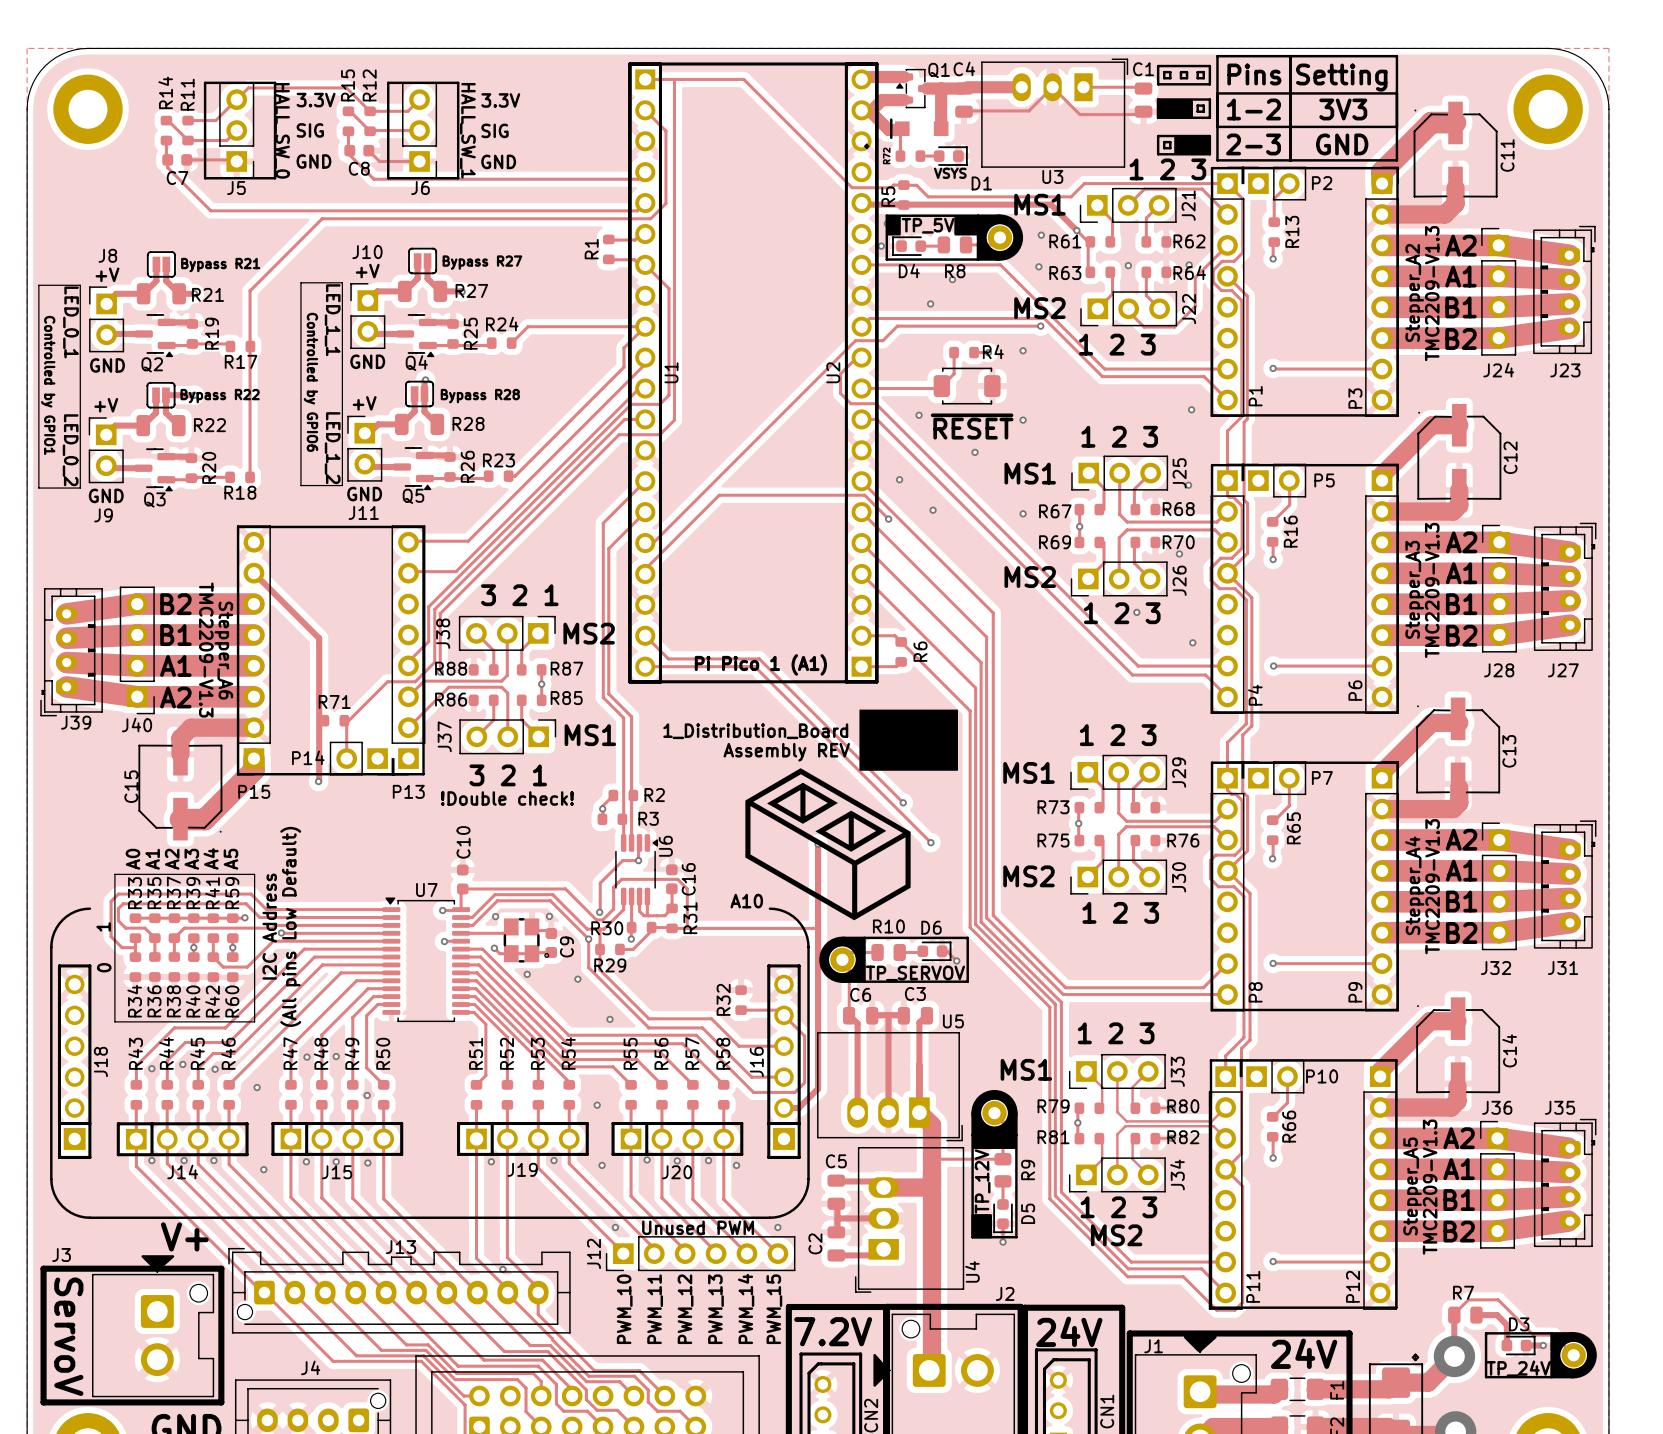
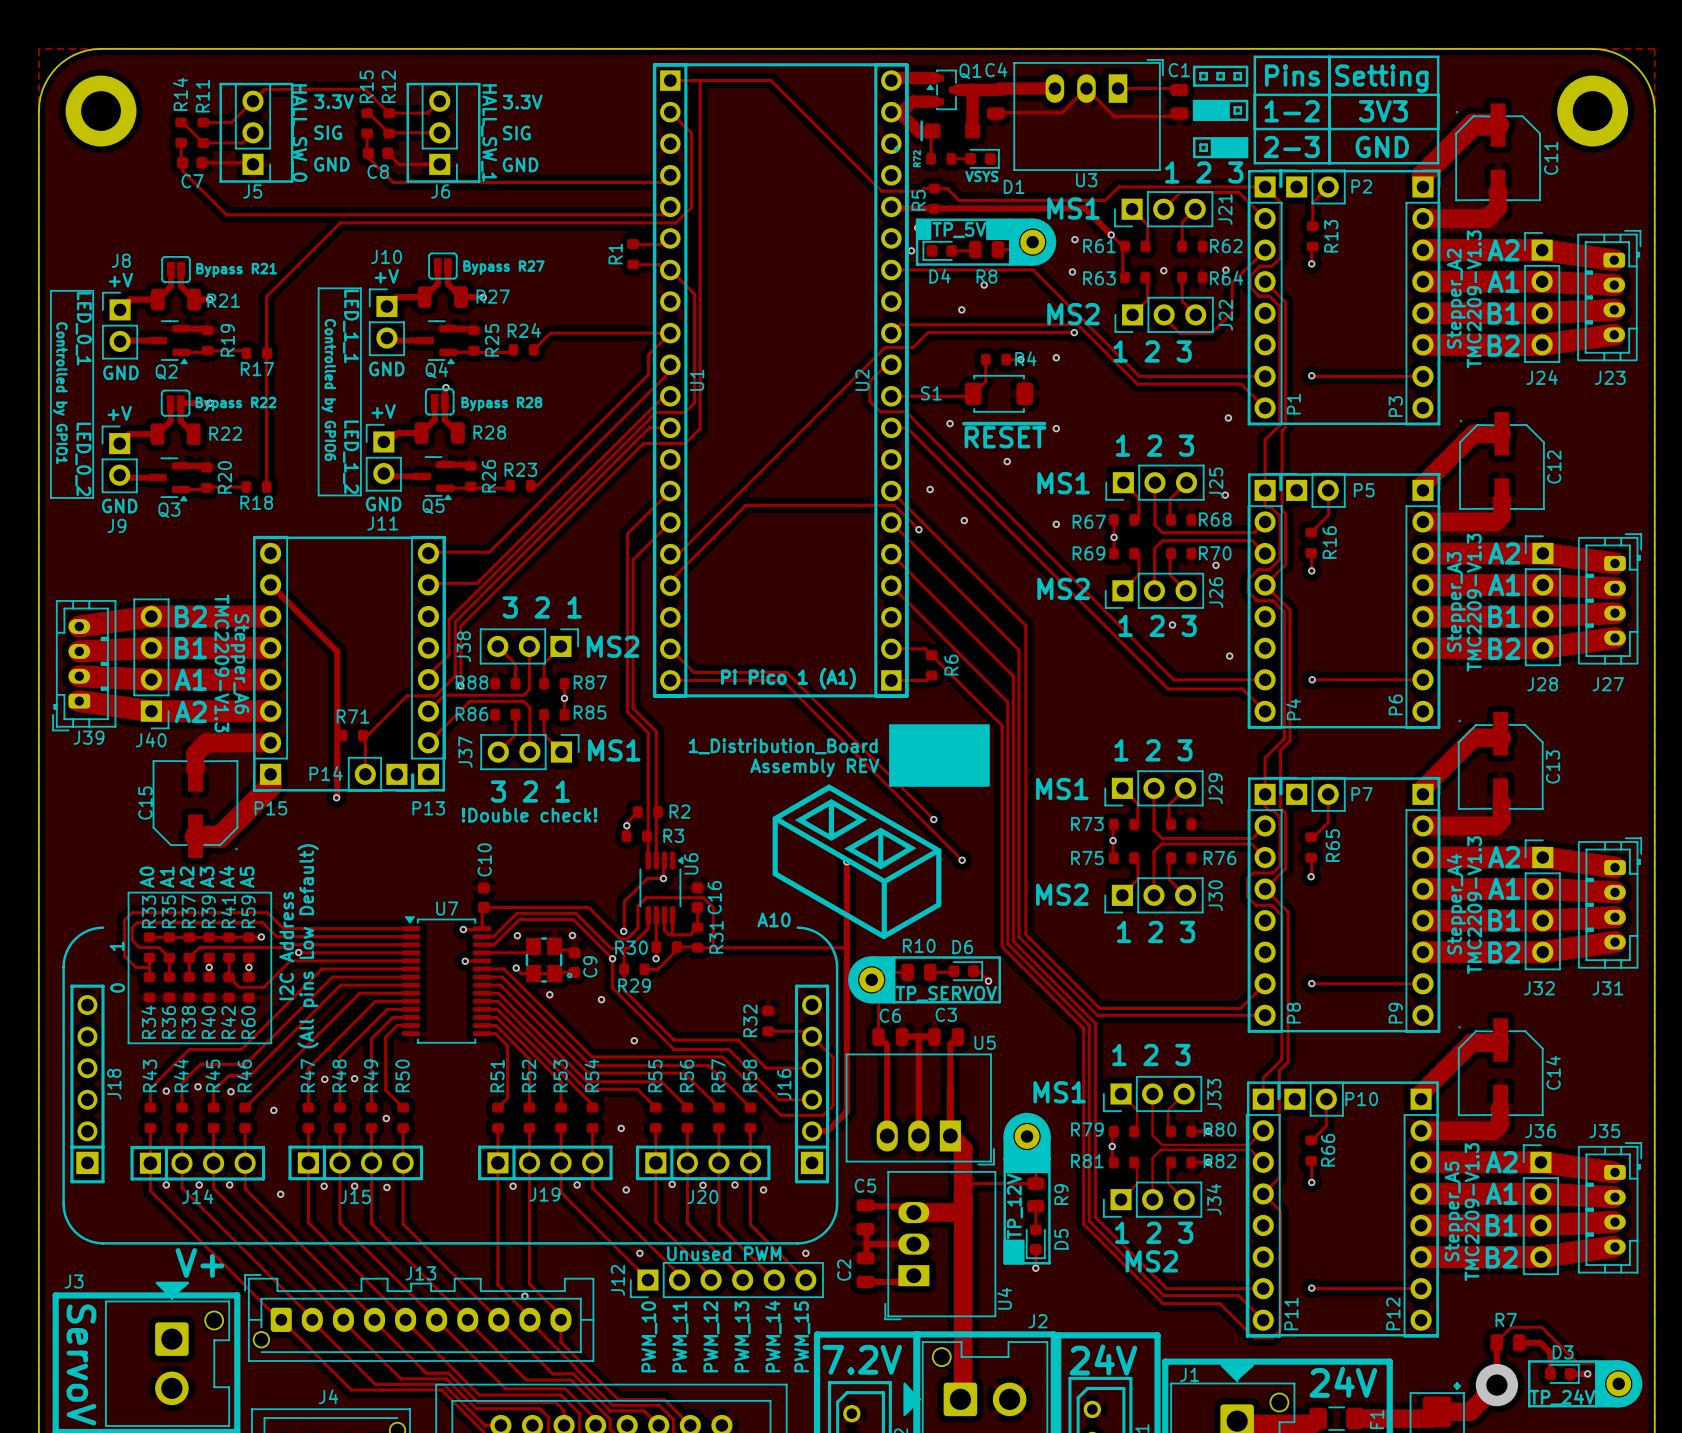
S1 name: none -> S1 (931, 393)

